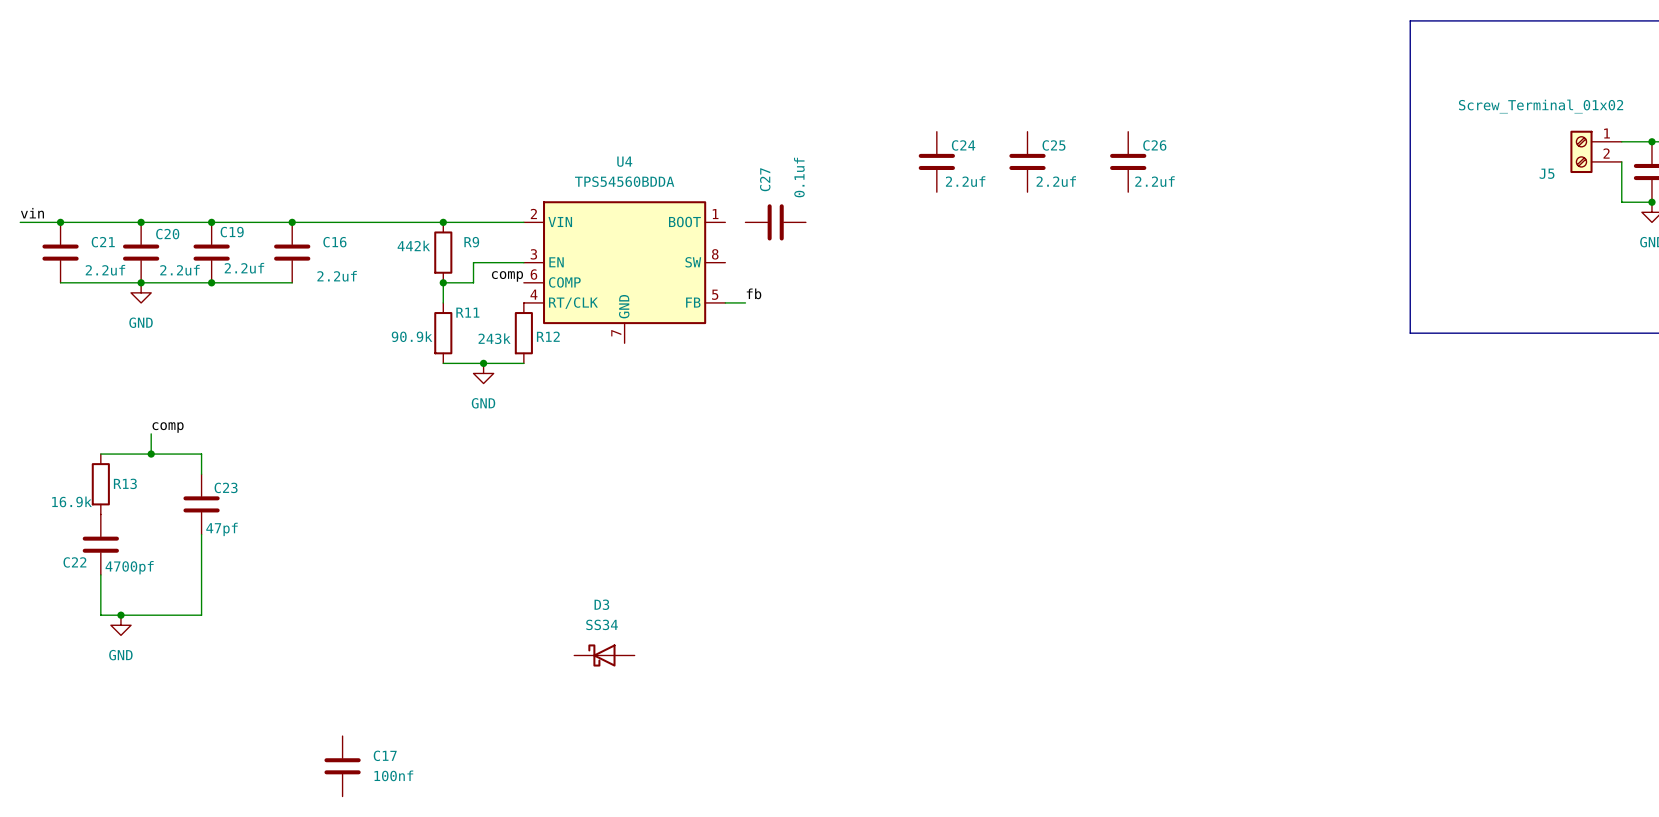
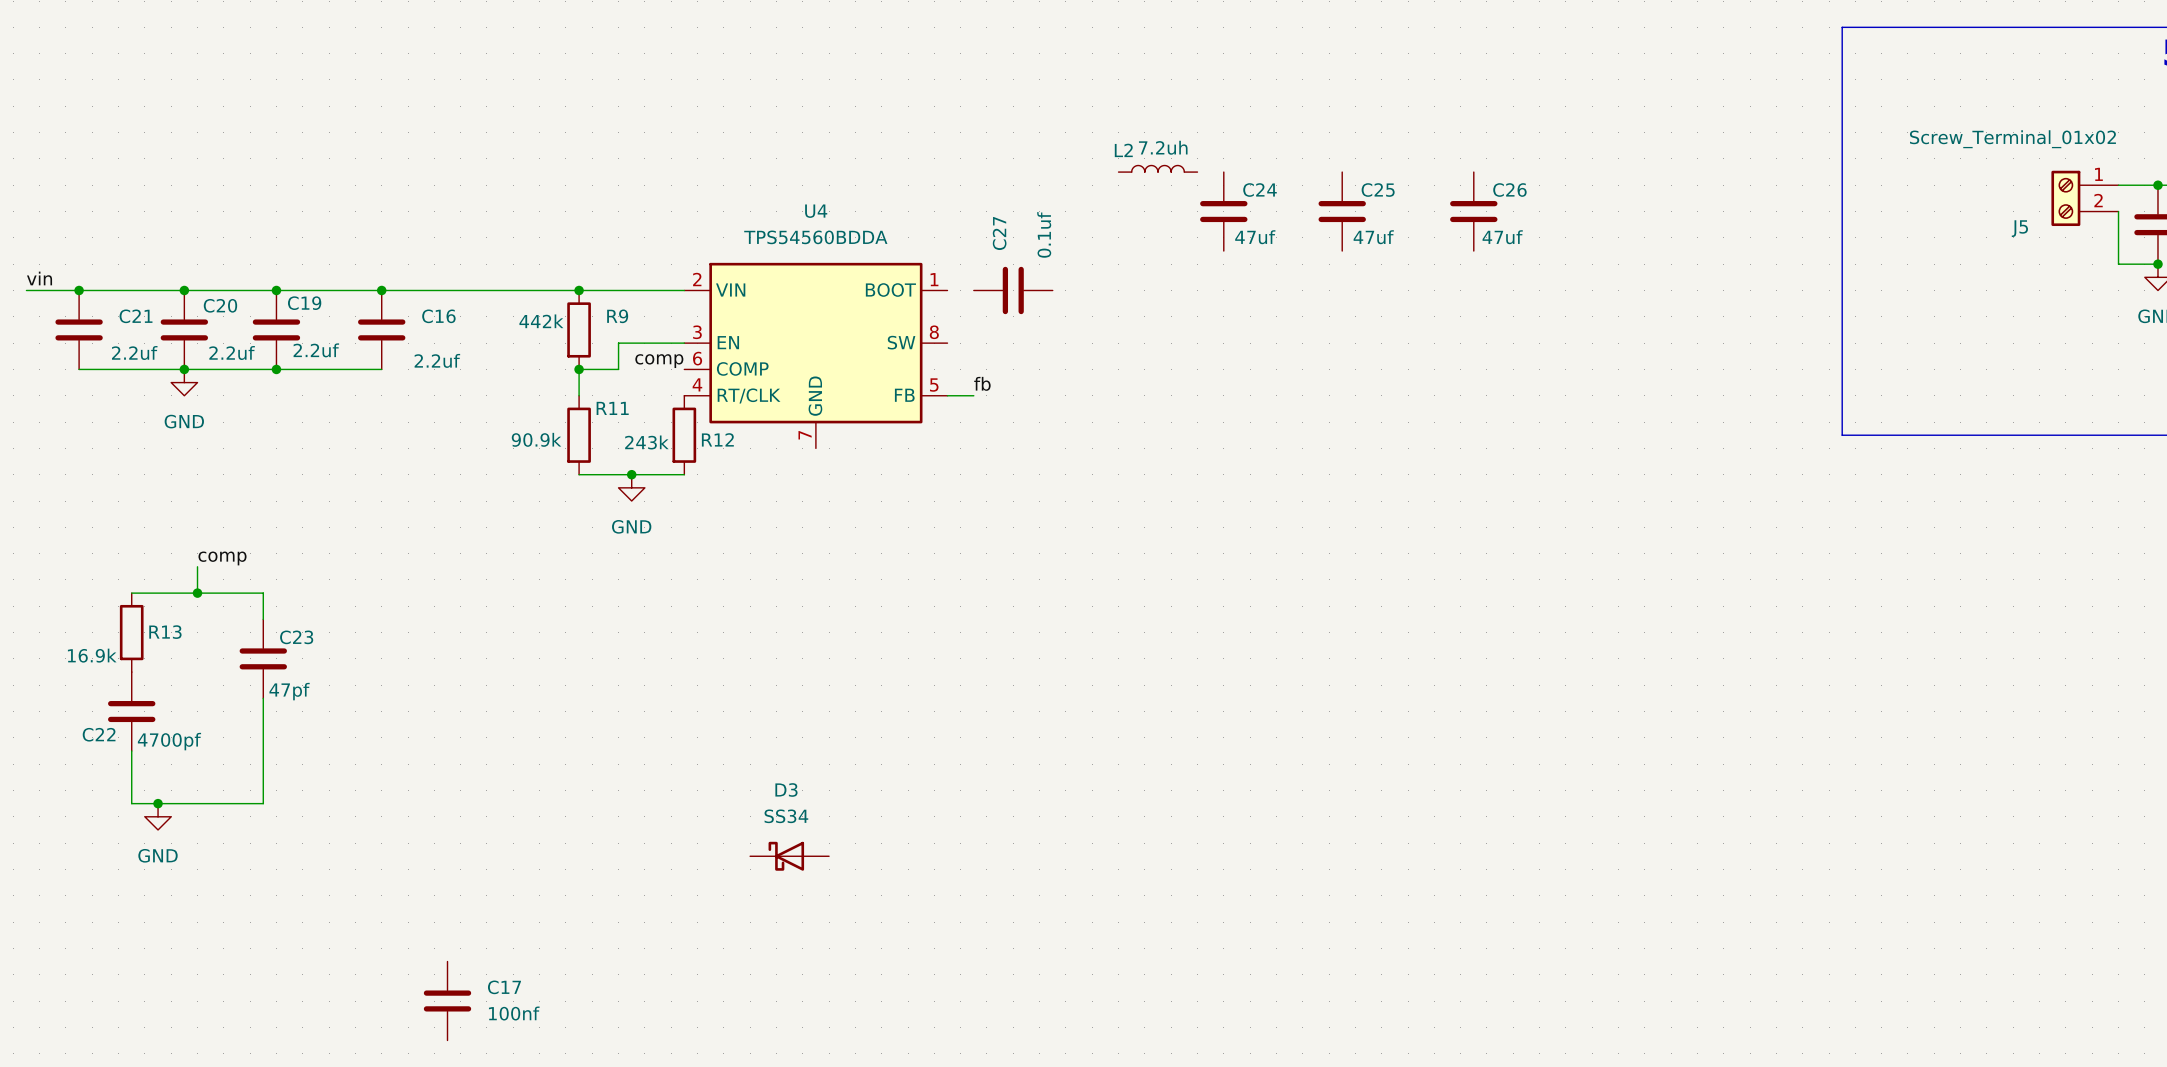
L2: none -> 7.2uh (1158, 168)
C24 value: 2.2uf (965, 181) -> 47uf (1255, 237)
C25 value: 2.2uf (1056, 181) -> 47uf (1373, 237)
C26 value: 2.2uf (1154, 181) -> 47uf (1502, 237)

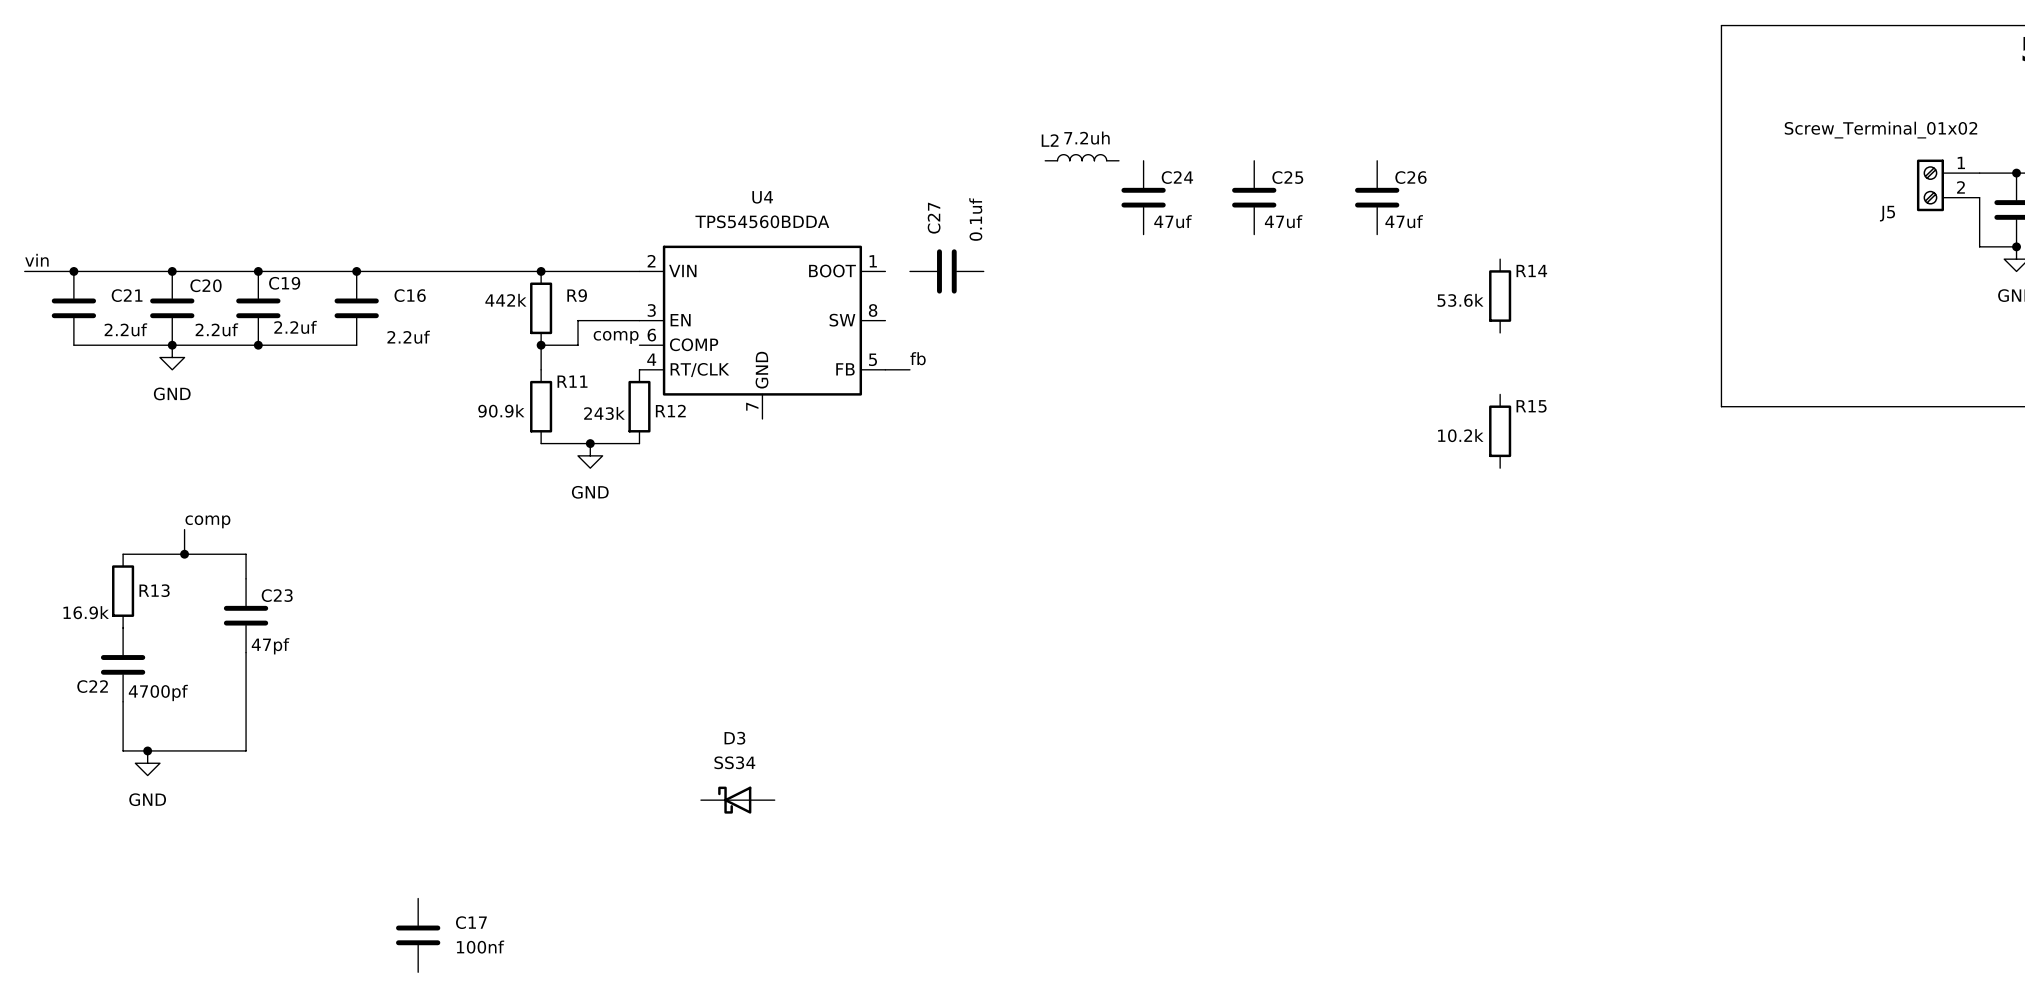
R14: none -> 53.6k (1500, 296)
R15: none -> 10.2k (1500, 431)

